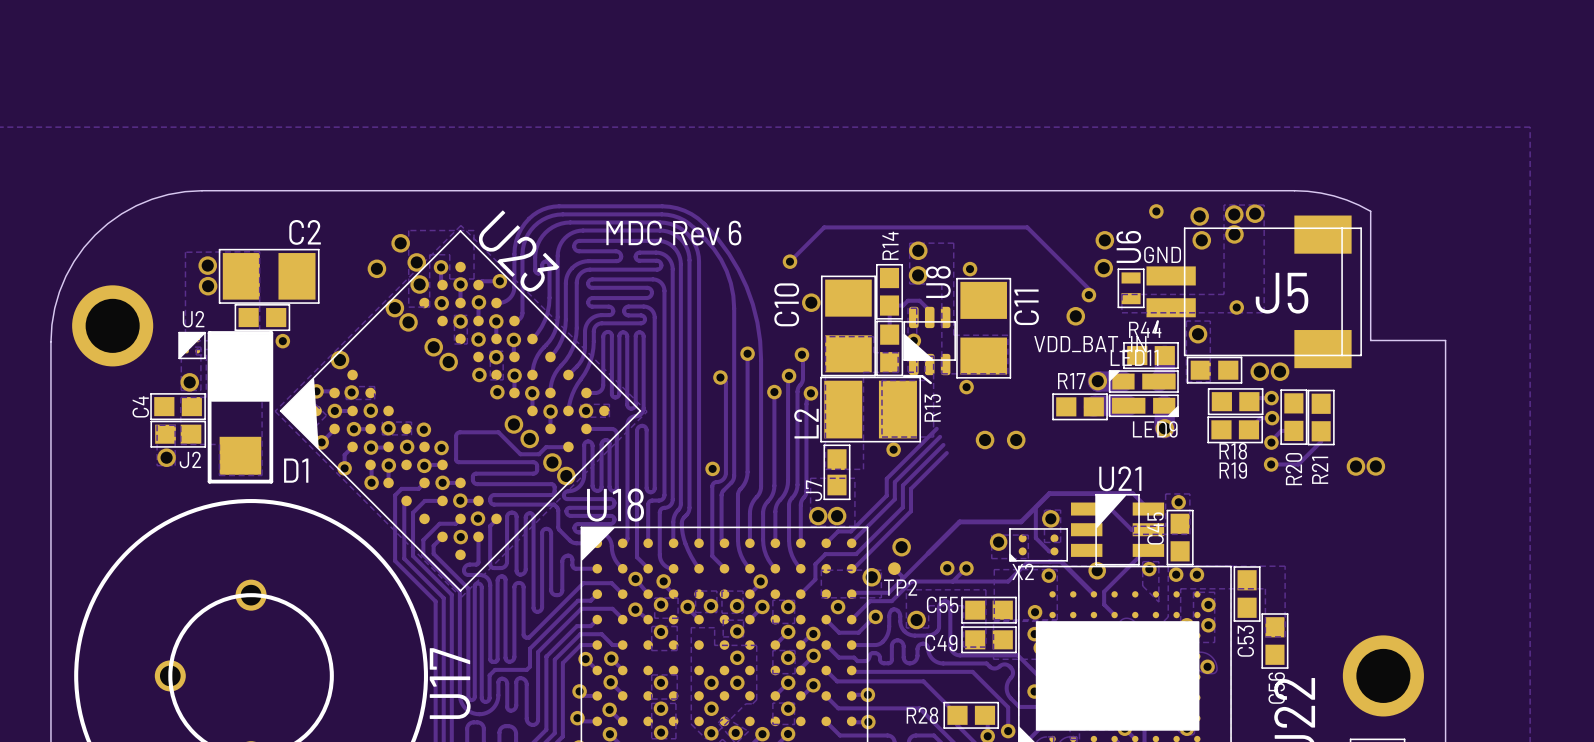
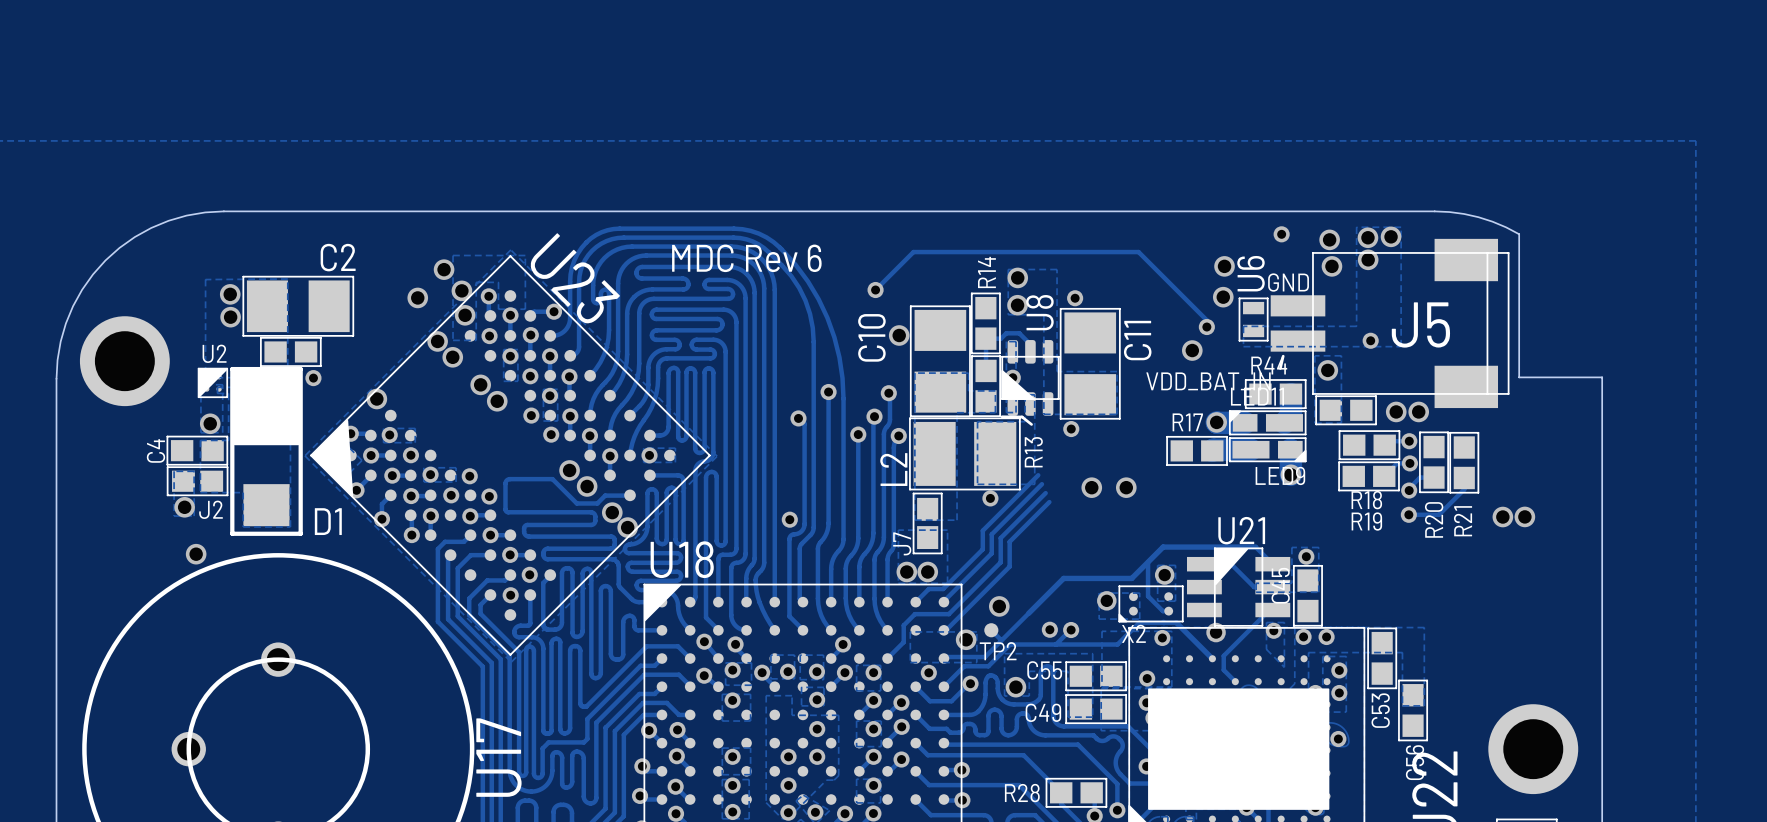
via: none -> (196, 554)

